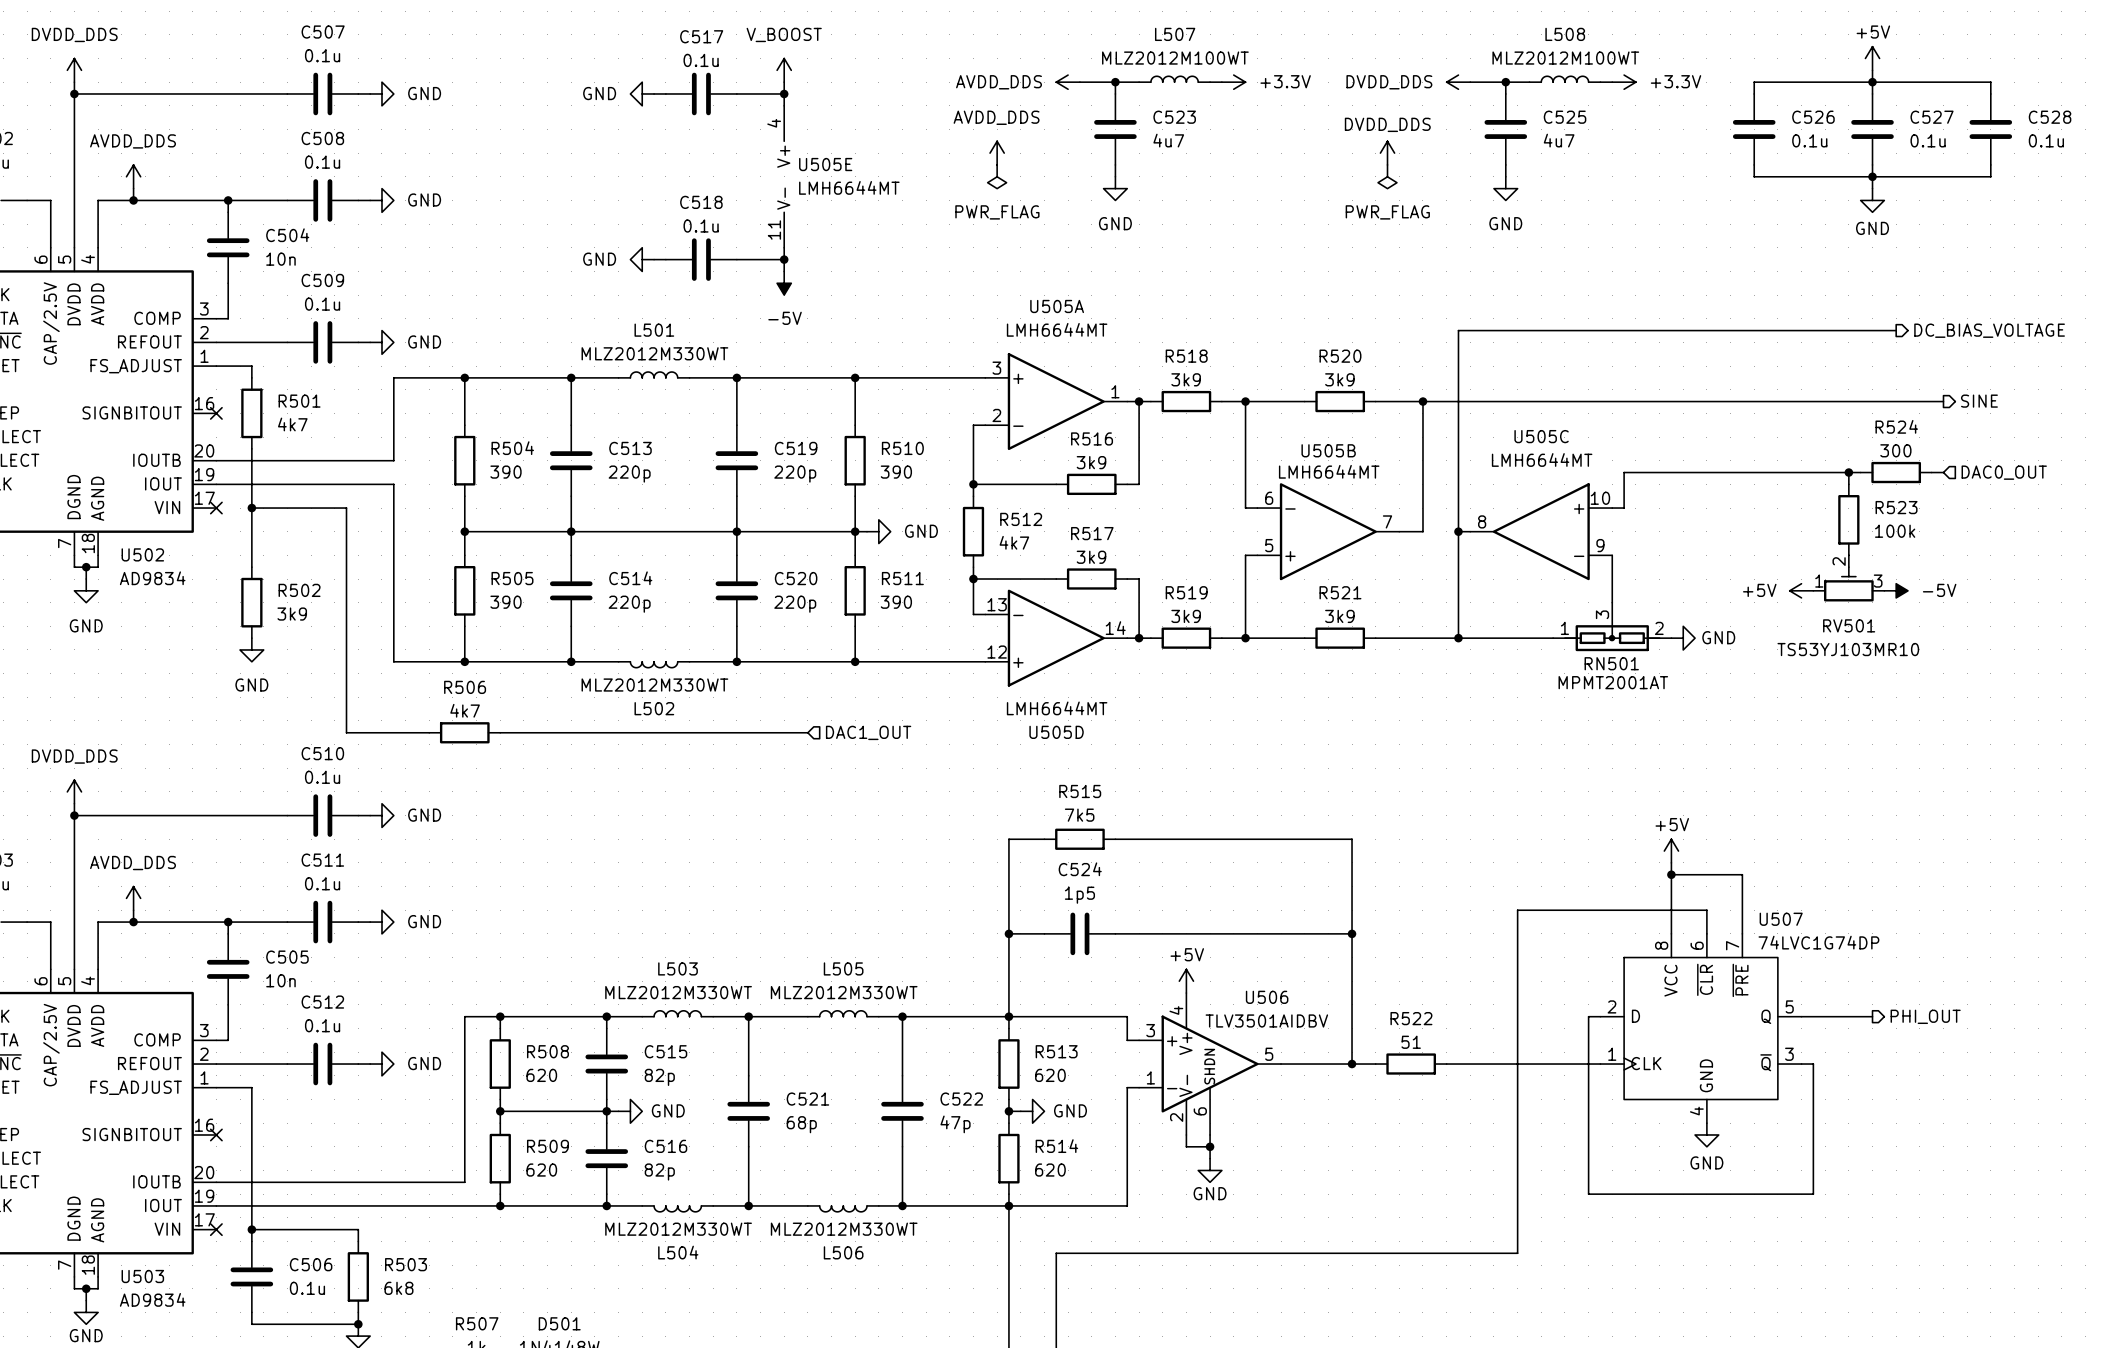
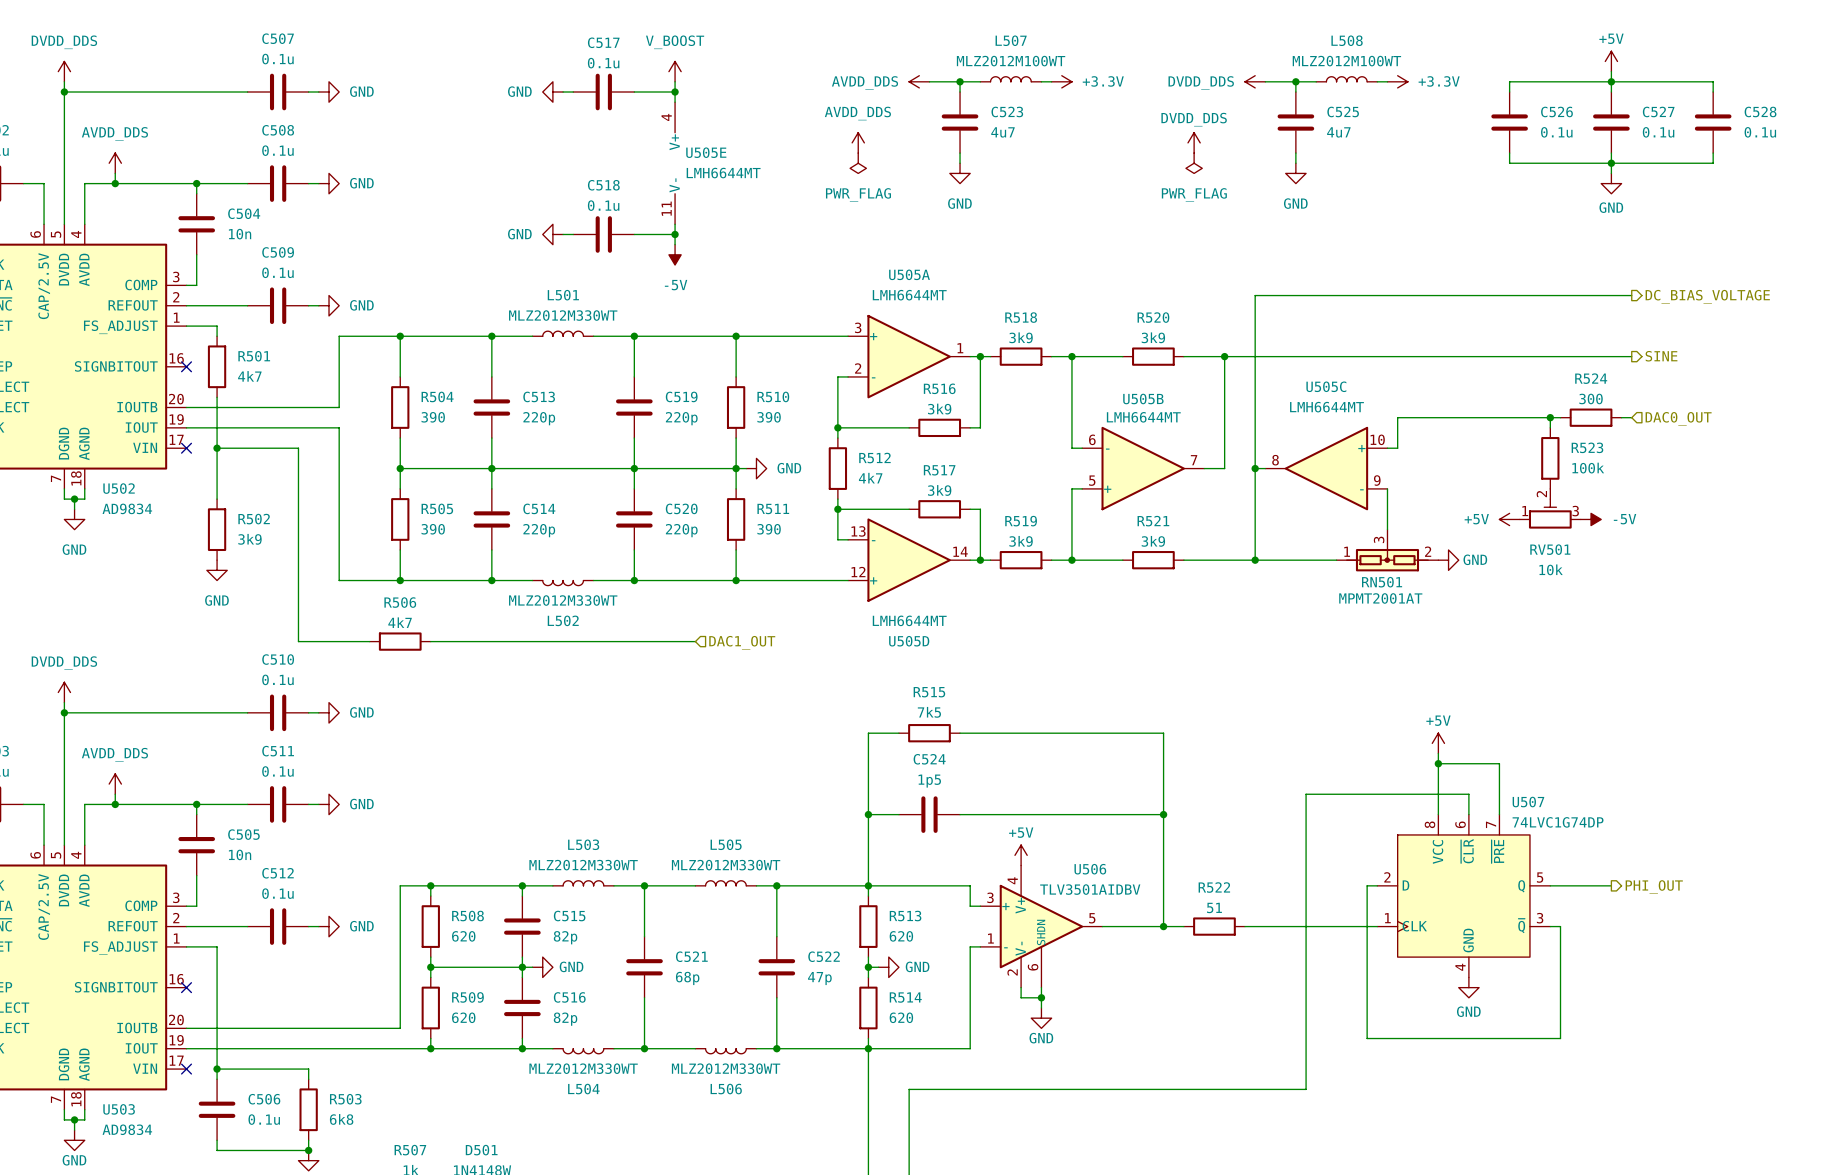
wire: (1896, 401) (1943, 401) -> none
hierarchical label position: SINE (1979, 401) -> SINE (1661, 356)
wire: (1813, 472) (1860, 472) -> none
wire: (1848, 472) (1848, 484) -> (1550, 417) (1550, 427)
junction position: (1848, 472) -> (1550, 417)
R524 position: (1896, 472) -> (1591, 417)
wire: (1931, 472) (1943, 472) -> (1621, 417) (1631, 417)
hierarchical label position: DAC0_OUT (2004, 472) -> DAC0_OUT (1678, 418)
R523 position: (1848, 519) -> (1550, 458)
RV501 position: (1848, 578) -> (1550, 508)
power symbol position: +5V (1801, 590) -> +5V (1509, 519)
power symbol position: -5V (1896, 590) -> -5V (1591, 519)
RV501 value: TS53YJ103MR10 (1848, 649) -> 10k (1551, 569)

